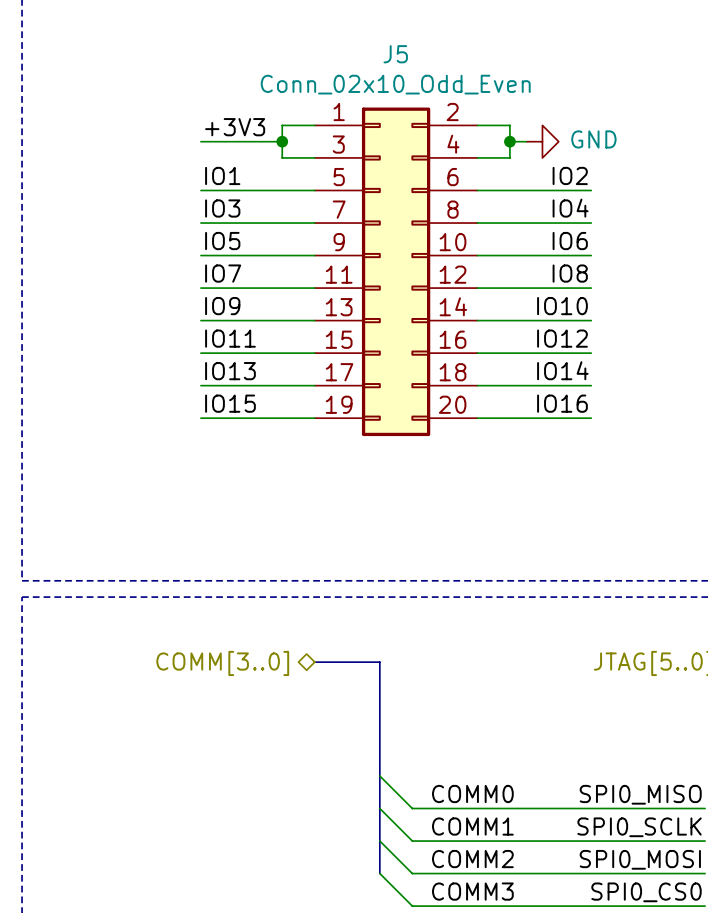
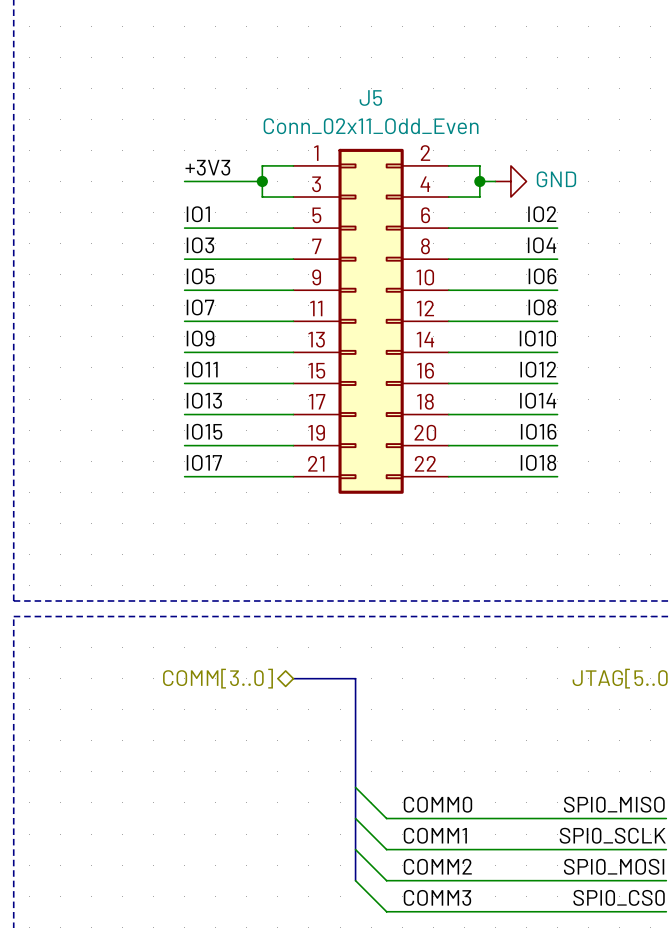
J5 value: Conn_02x10_Odd_Even (395, 84) -> Conn_02x11_Odd_Even (371, 126)
J5 symbol: [314, 107, 478, 437] -> [293, 148, 449, 494]
label: none -> IO17 (204, 462)
label: none -> IO18 (538, 462)
wire: none -> (184, 476) (293, 476)
wire: none -> (448, 476) (557, 476)

